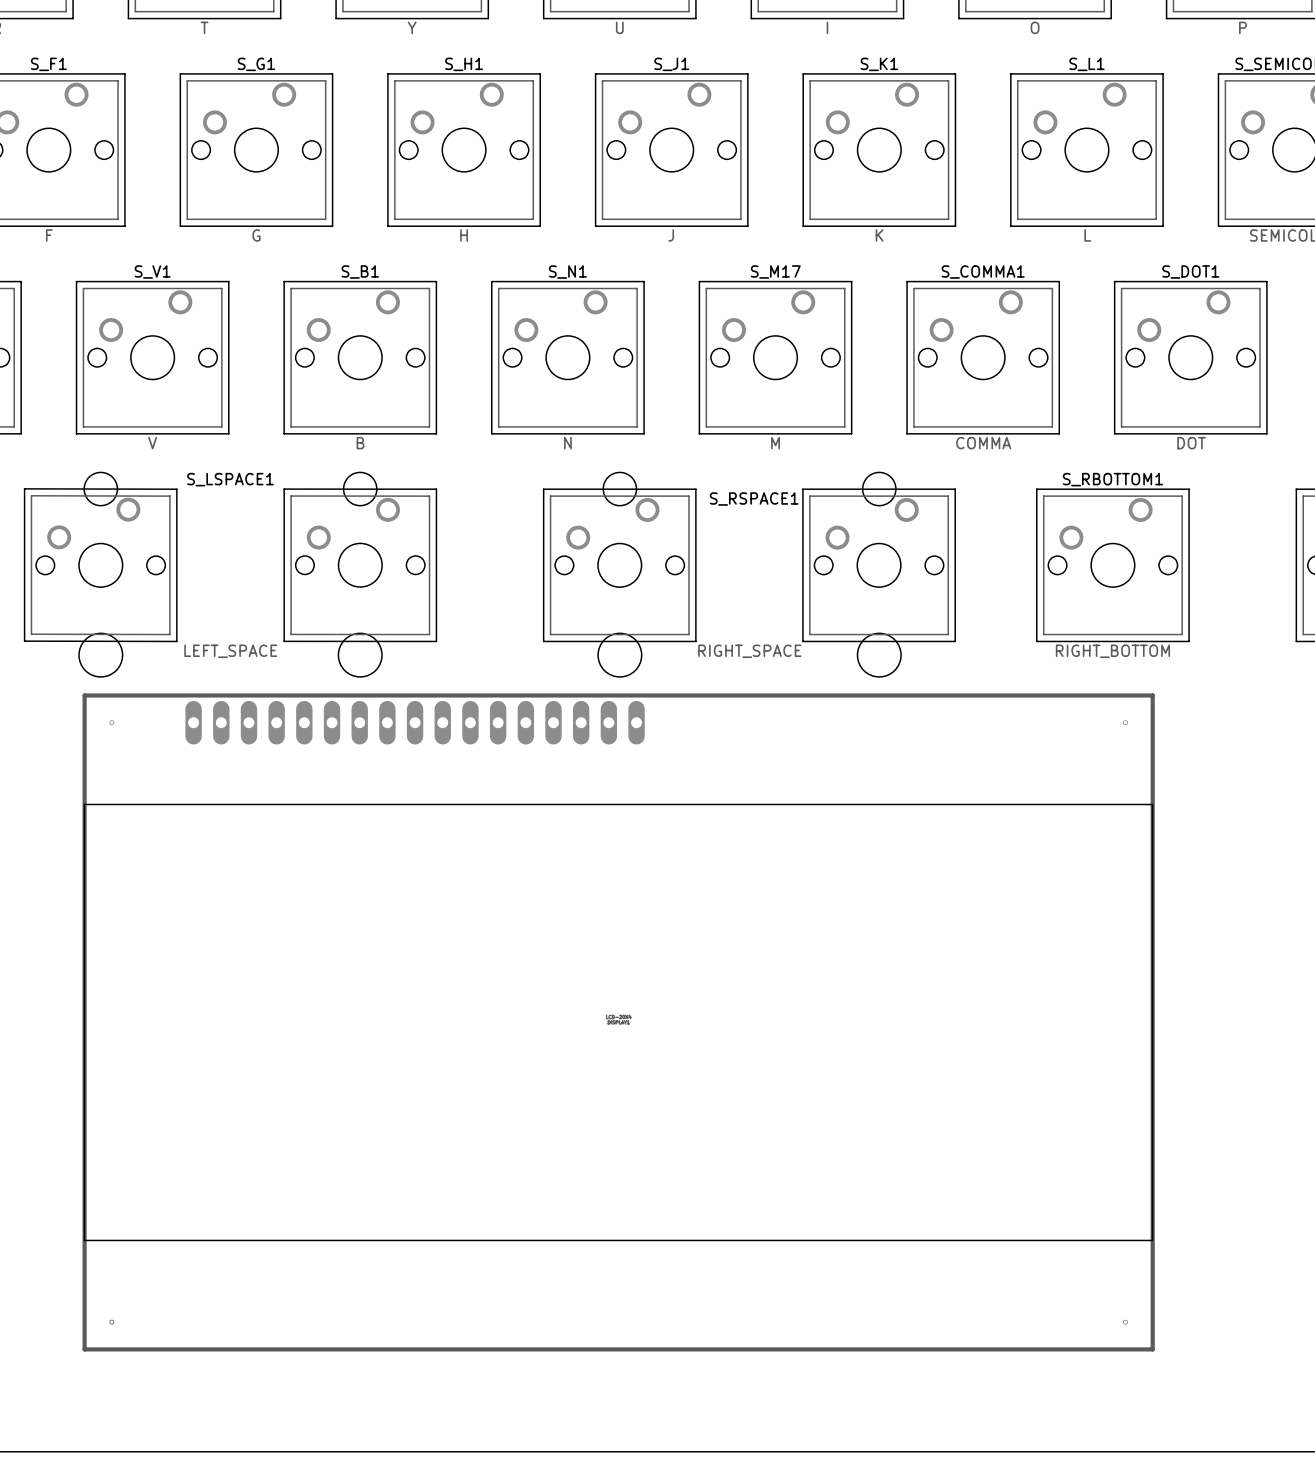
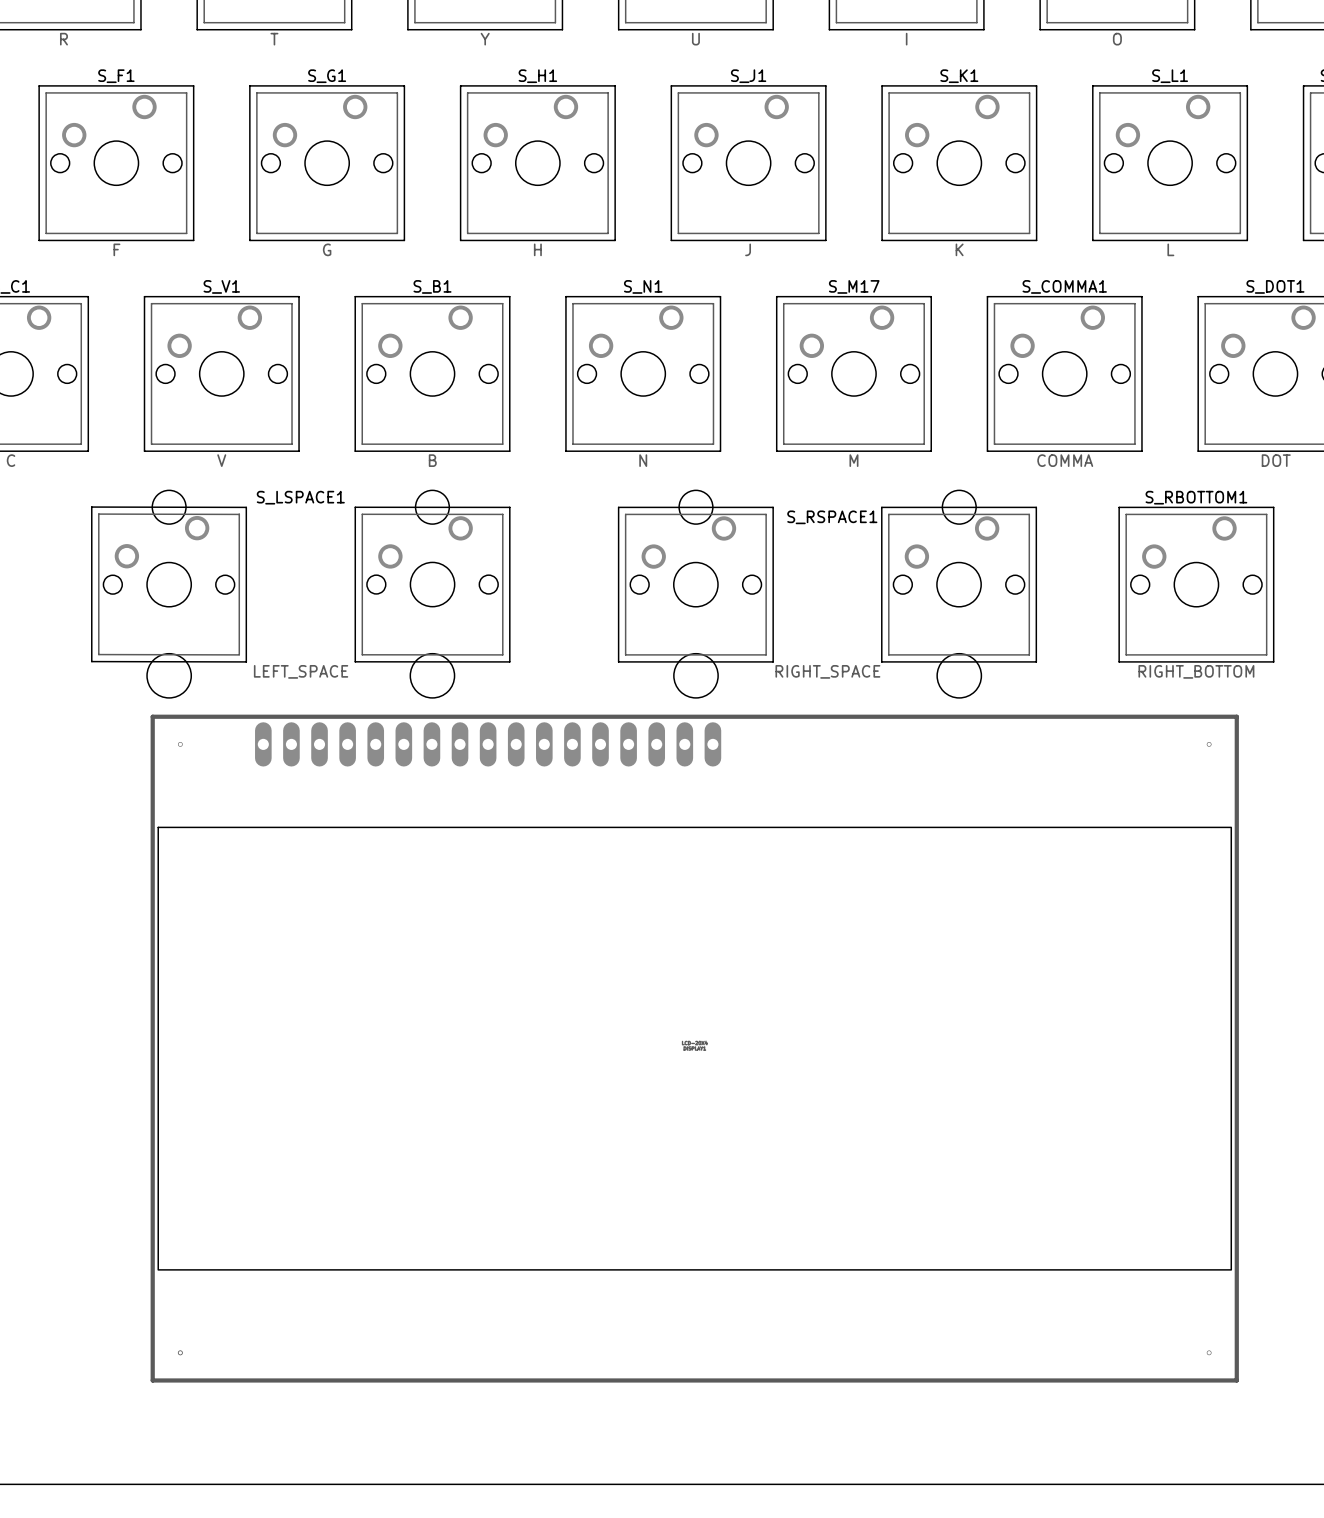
part footprint: [82, 693, 1155, 1352] -> [150, 714, 1239, 1383]

